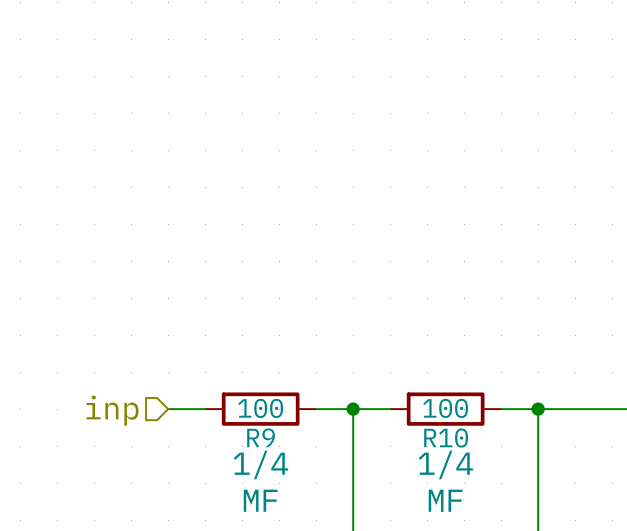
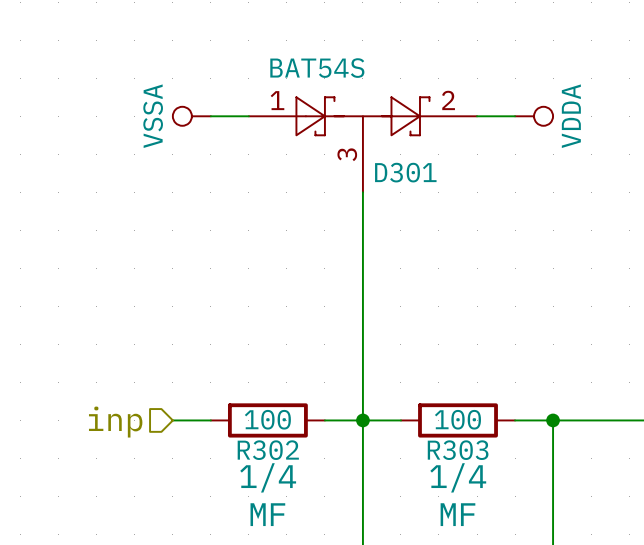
power symbol: none -> VSSA (191, 116)
wire: none -> (210, 116) (248, 116)
wire: none -> (477, 116) (515, 116)
power symbol: none -> VDDA (534, 116)
D301: none -> BAT54S (362, 144)
wire: none -> (362, 192) (362, 420)
R9 name: R9 (261, 437) -> R302 (268, 450)
R10 name: R10 (446, 438) -> R303 (458, 450)

